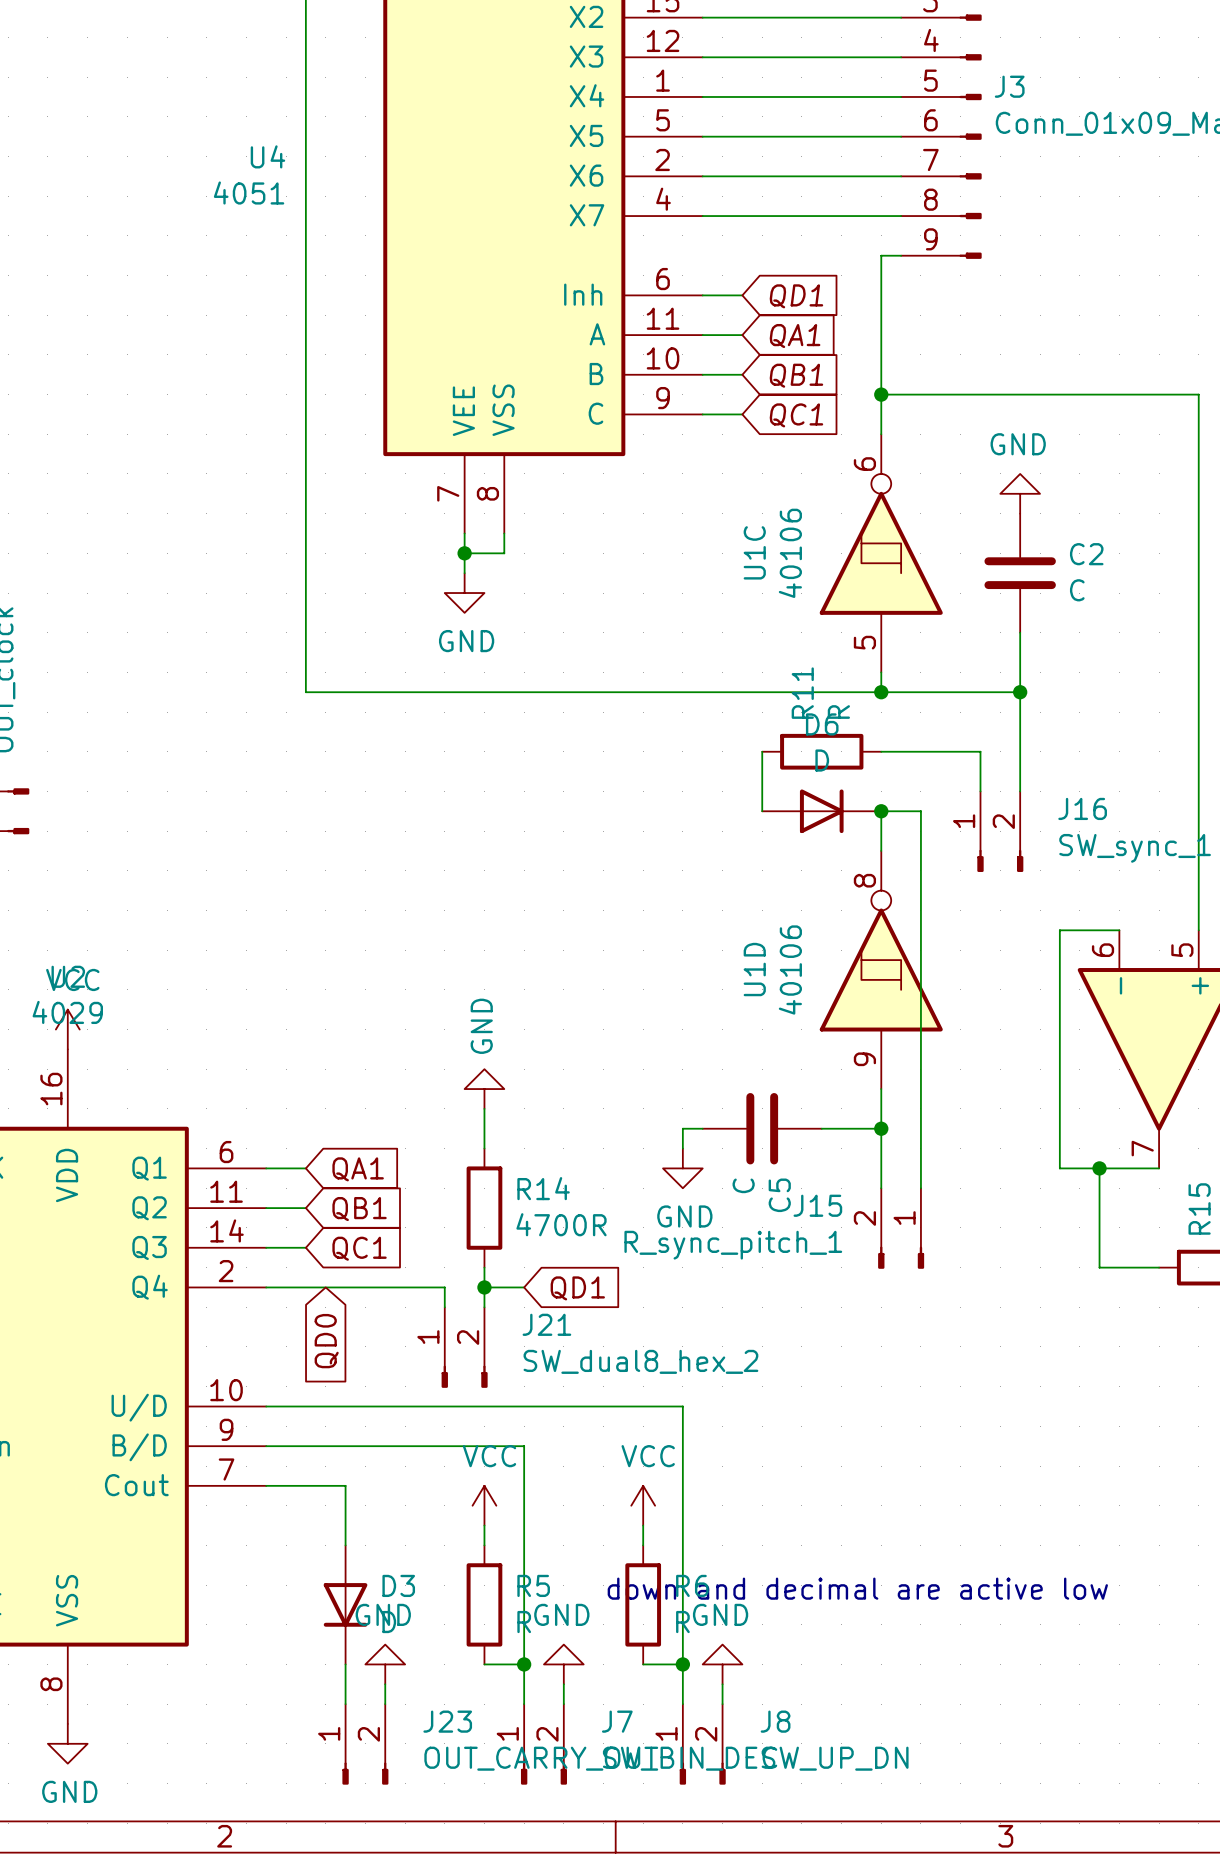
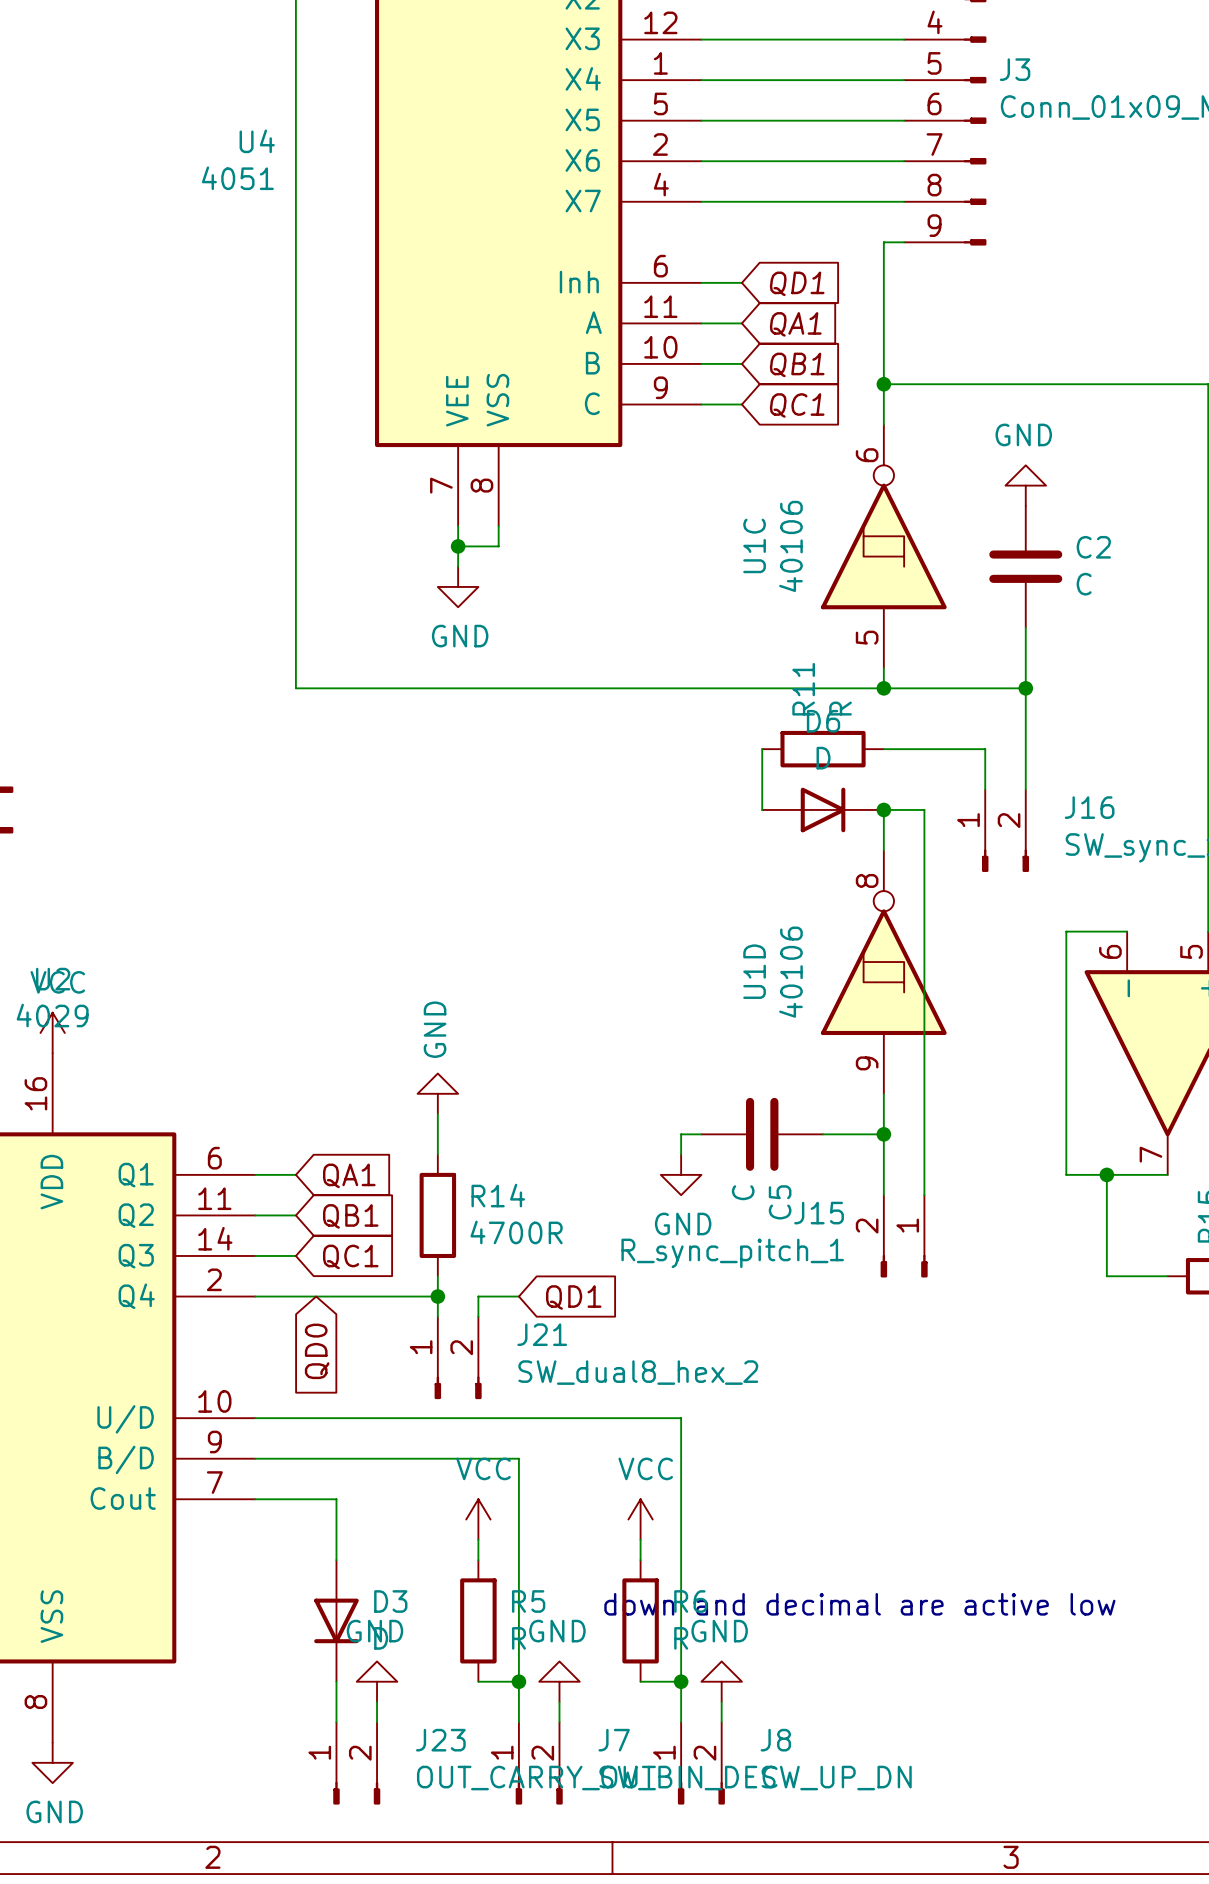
power symbol position: GND (484, 1089) -> GND (437, 1093)
wire: (484, 1108) (484, 1148) -> (437, 1114) (437, 1154)
R14 position: (484, 1208) -> (437, 1215)
wire: (484, 1267) (484, 1287) -> (437, 1276) (437, 1296)
junction position: (484, 1287) -> (437, 1296)

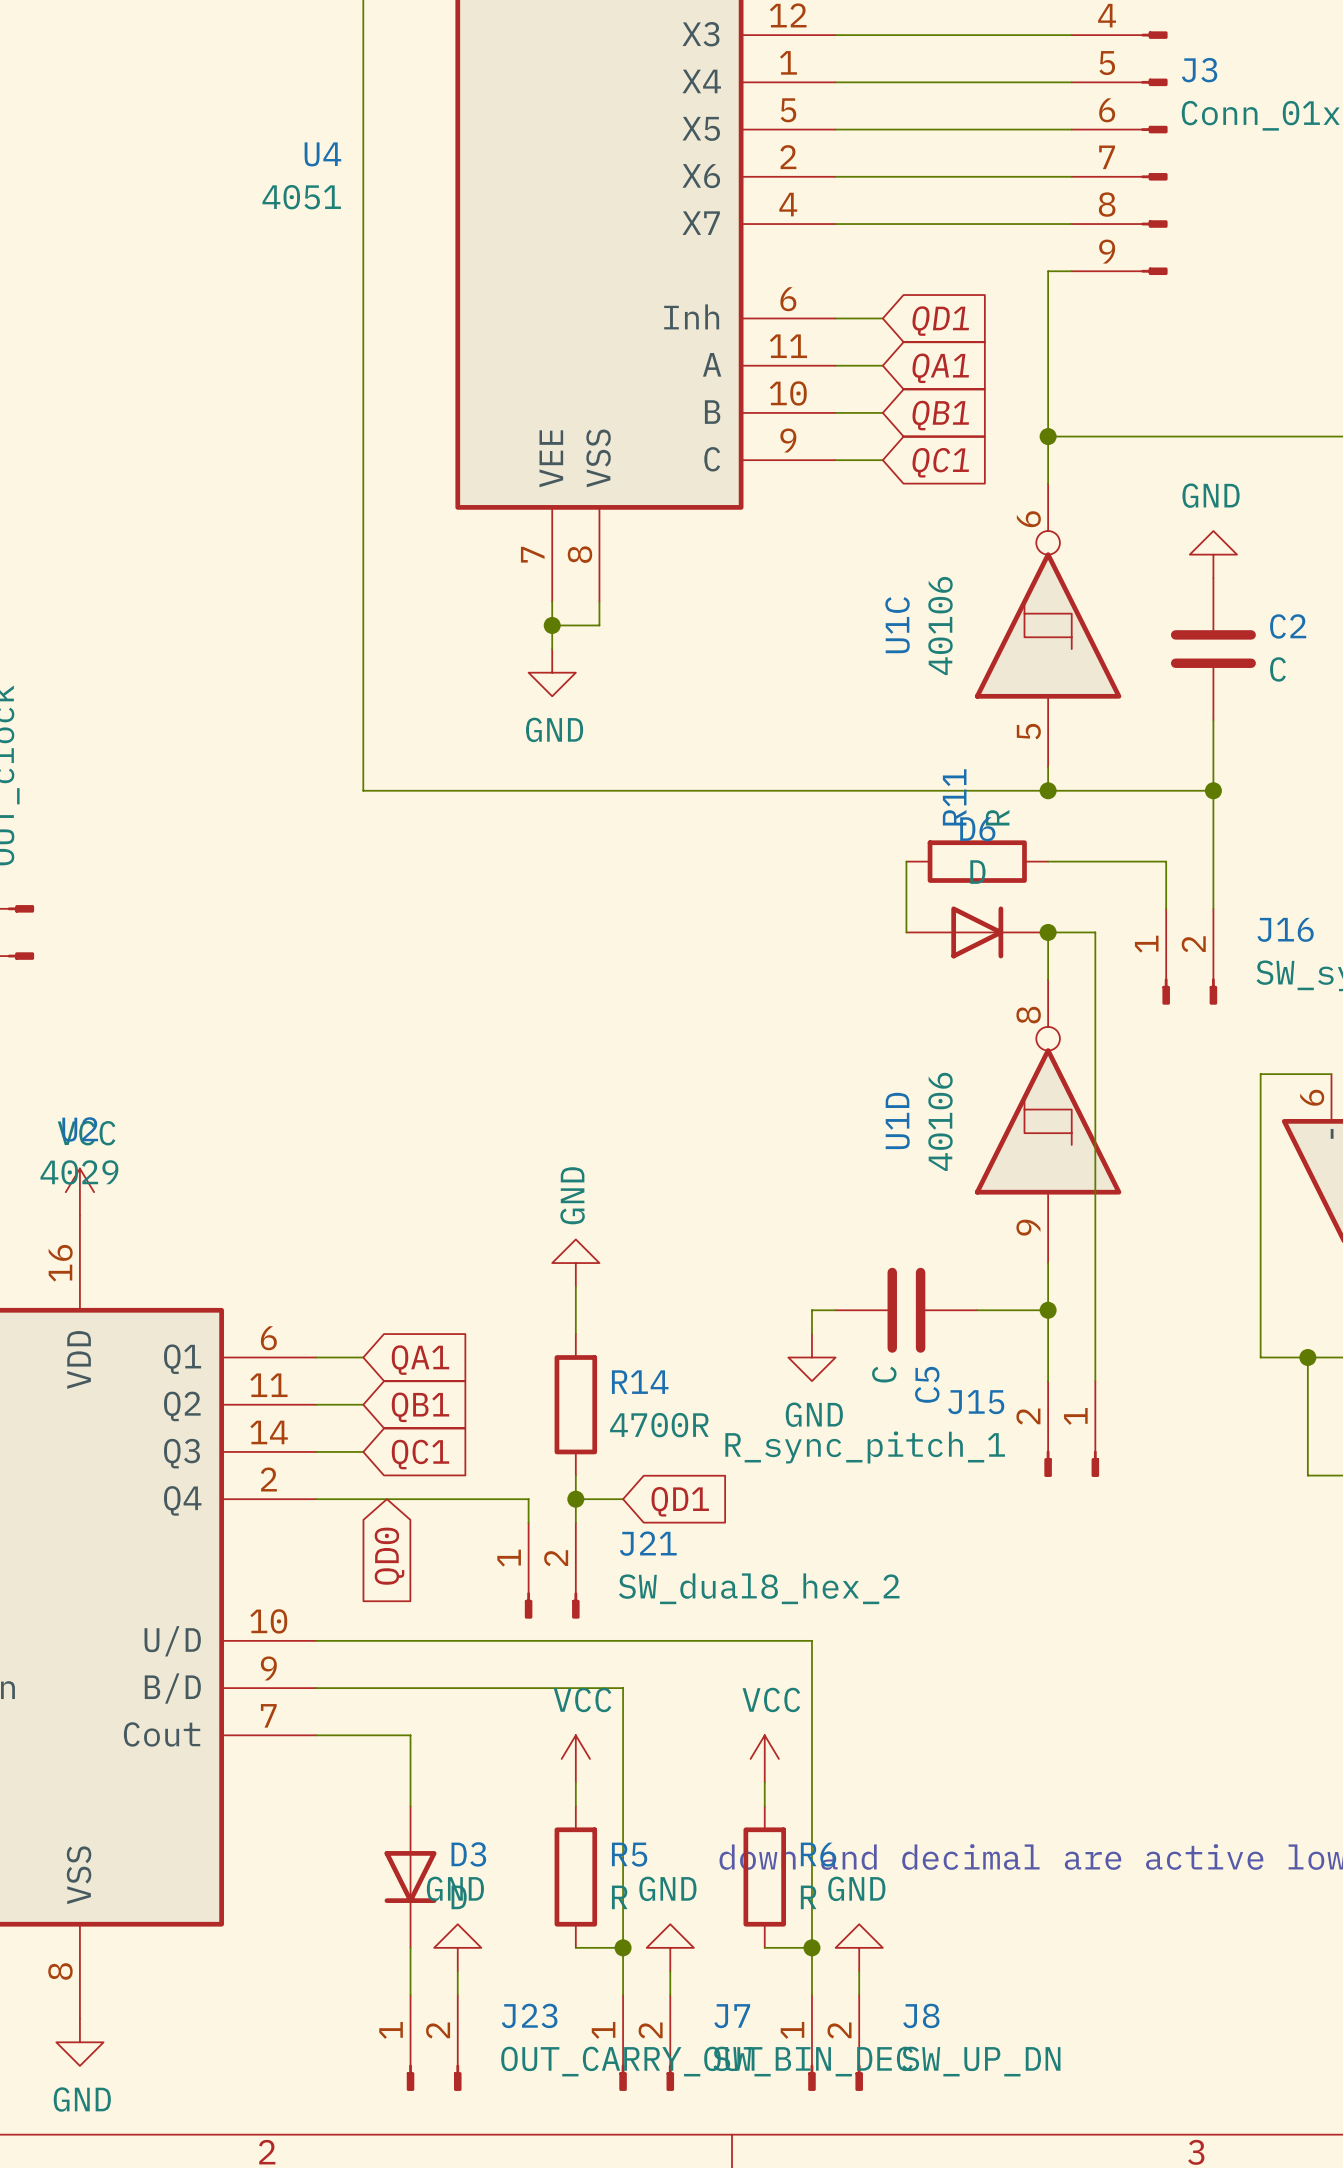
power symbol position: GND (437, 1093) -> GND (575, 1263)
wire: (437, 1114) (437, 1154) -> (575, 1286) (575, 1333)
R14 position: (437, 1215) -> (575, 1404)
wire: (437, 1276) (437, 1296) -> (575, 1475) (575, 1499)
junction position: (437, 1296) -> (575, 1499)

